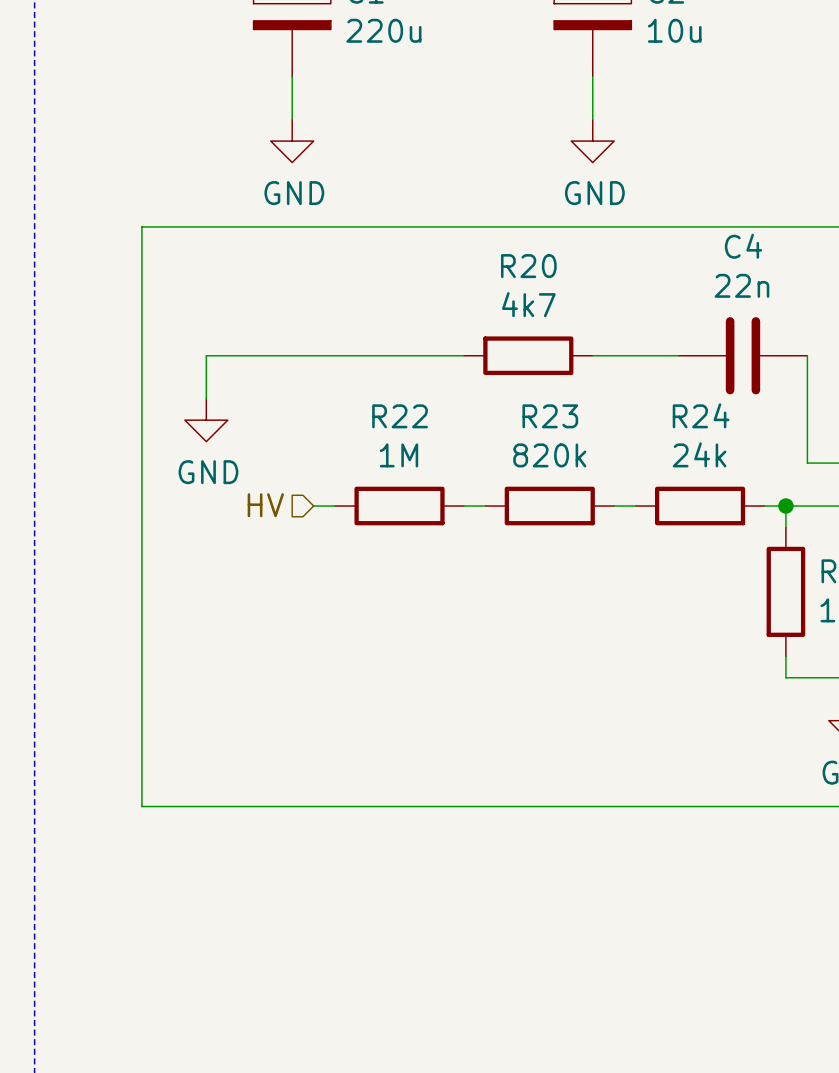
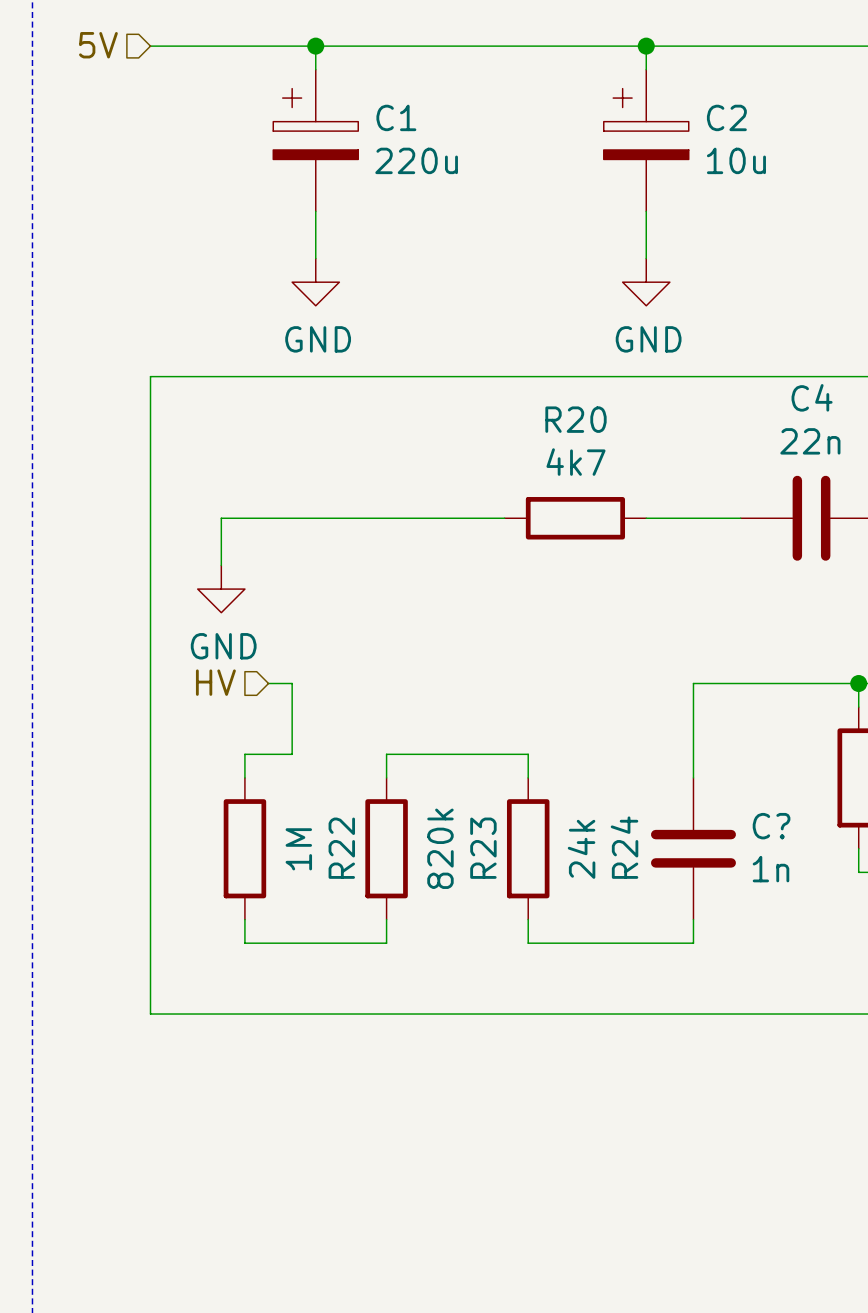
hierarchical label position: HV (265, 505) -> HV (215, 682)
wire: none -> (268, 683) (292, 683) (292, 754) (244, 754) (244, 777)
wire: (313, 506) (335, 506) -> none
R22 rotation: 0° (399, 506) -> 90° clockwise (244, 848)
R22 position: (399, 506) -> (244, 848)
wire: (463, 506) (485, 506) -> none
R23 rotation: 0° (549, 506) -> 90° clockwise (386, 848)
R23 position: (549, 506) -> (386, 848)
wire: (614, 506) (635, 506) -> none
R24 rotation: 0° (700, 506) -> 90° clockwise (528, 848)
R24 position: (700, 506) -> (528, 848)
wire: none -> (835, 683) (693, 683) (693, 777)
wire: none -> (386, 777) (386, 754) (528, 754) (528, 777)
C?: none -> 1n (693, 848)
wire: none -> (244, 919) (244, 943) (386, 943) (386, 919)
wire: none -> (528, 919) (528, 943) (693, 943) (693, 919)

